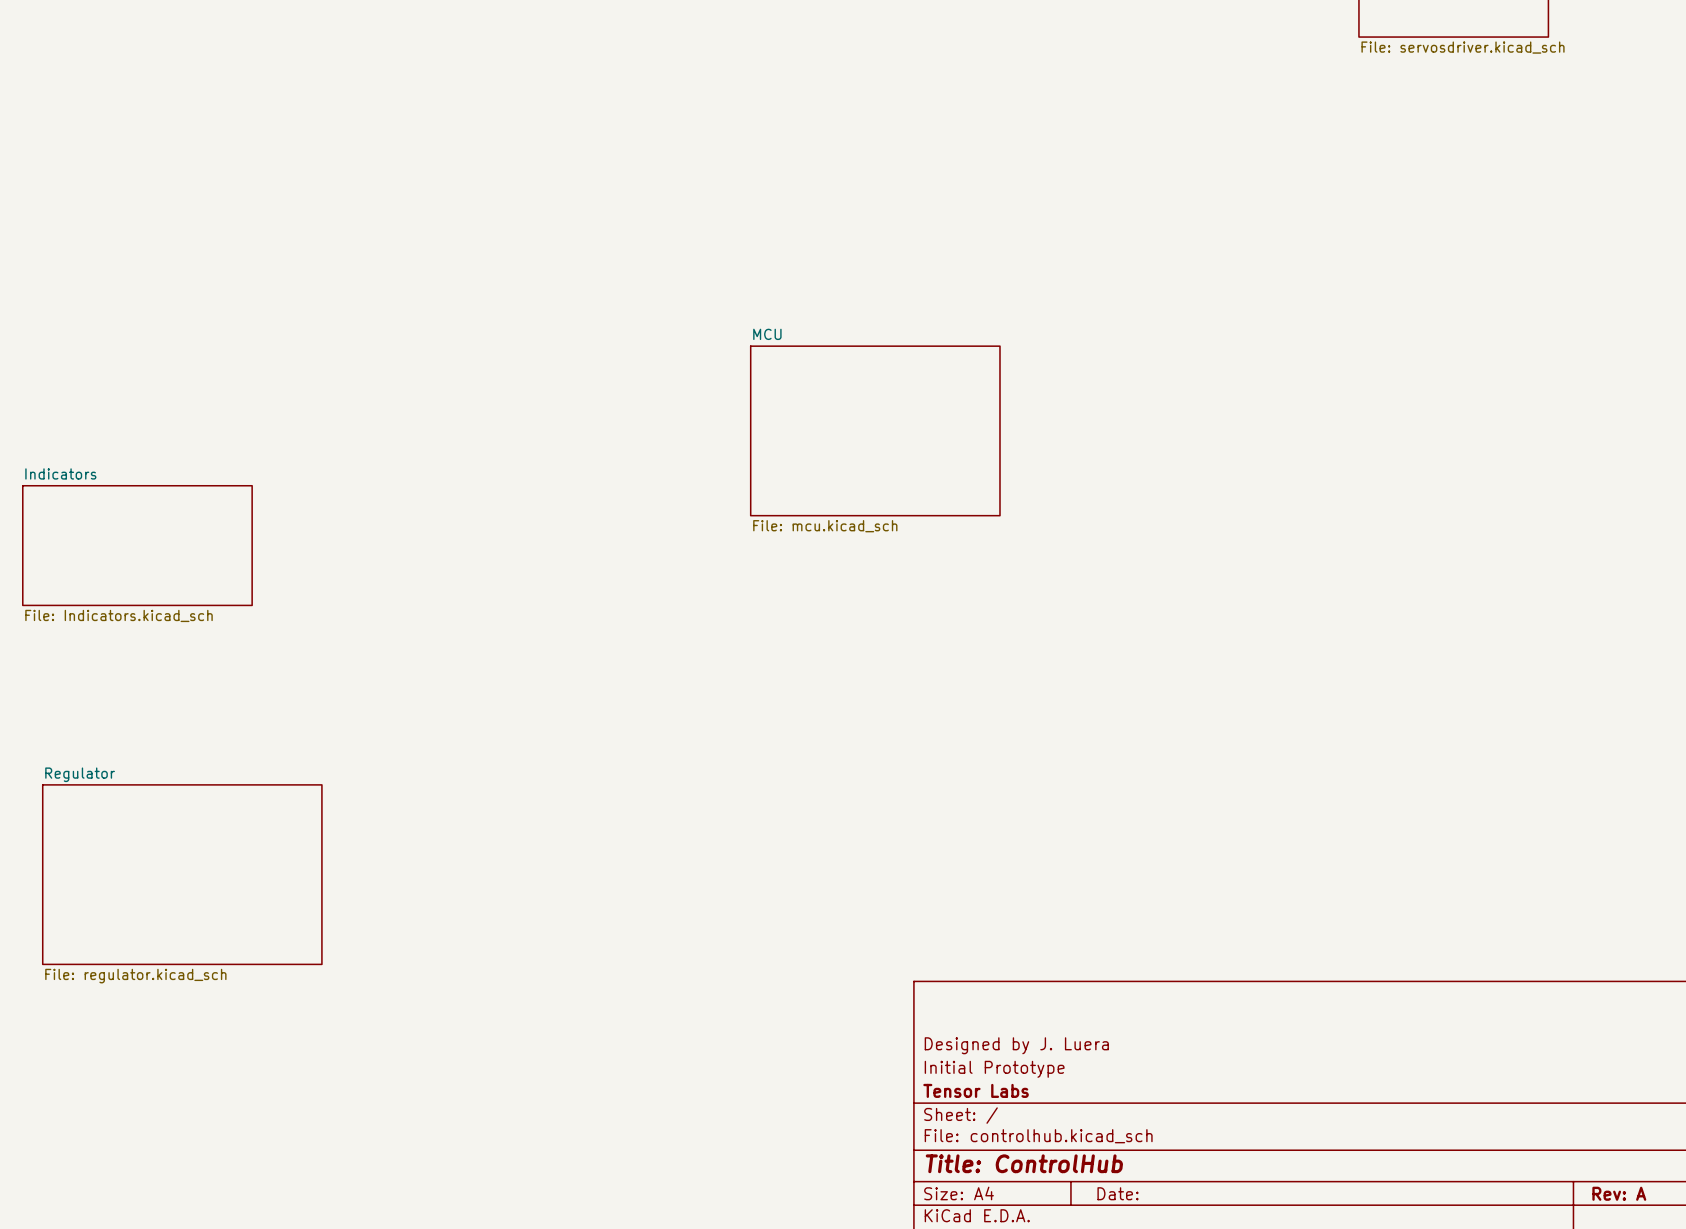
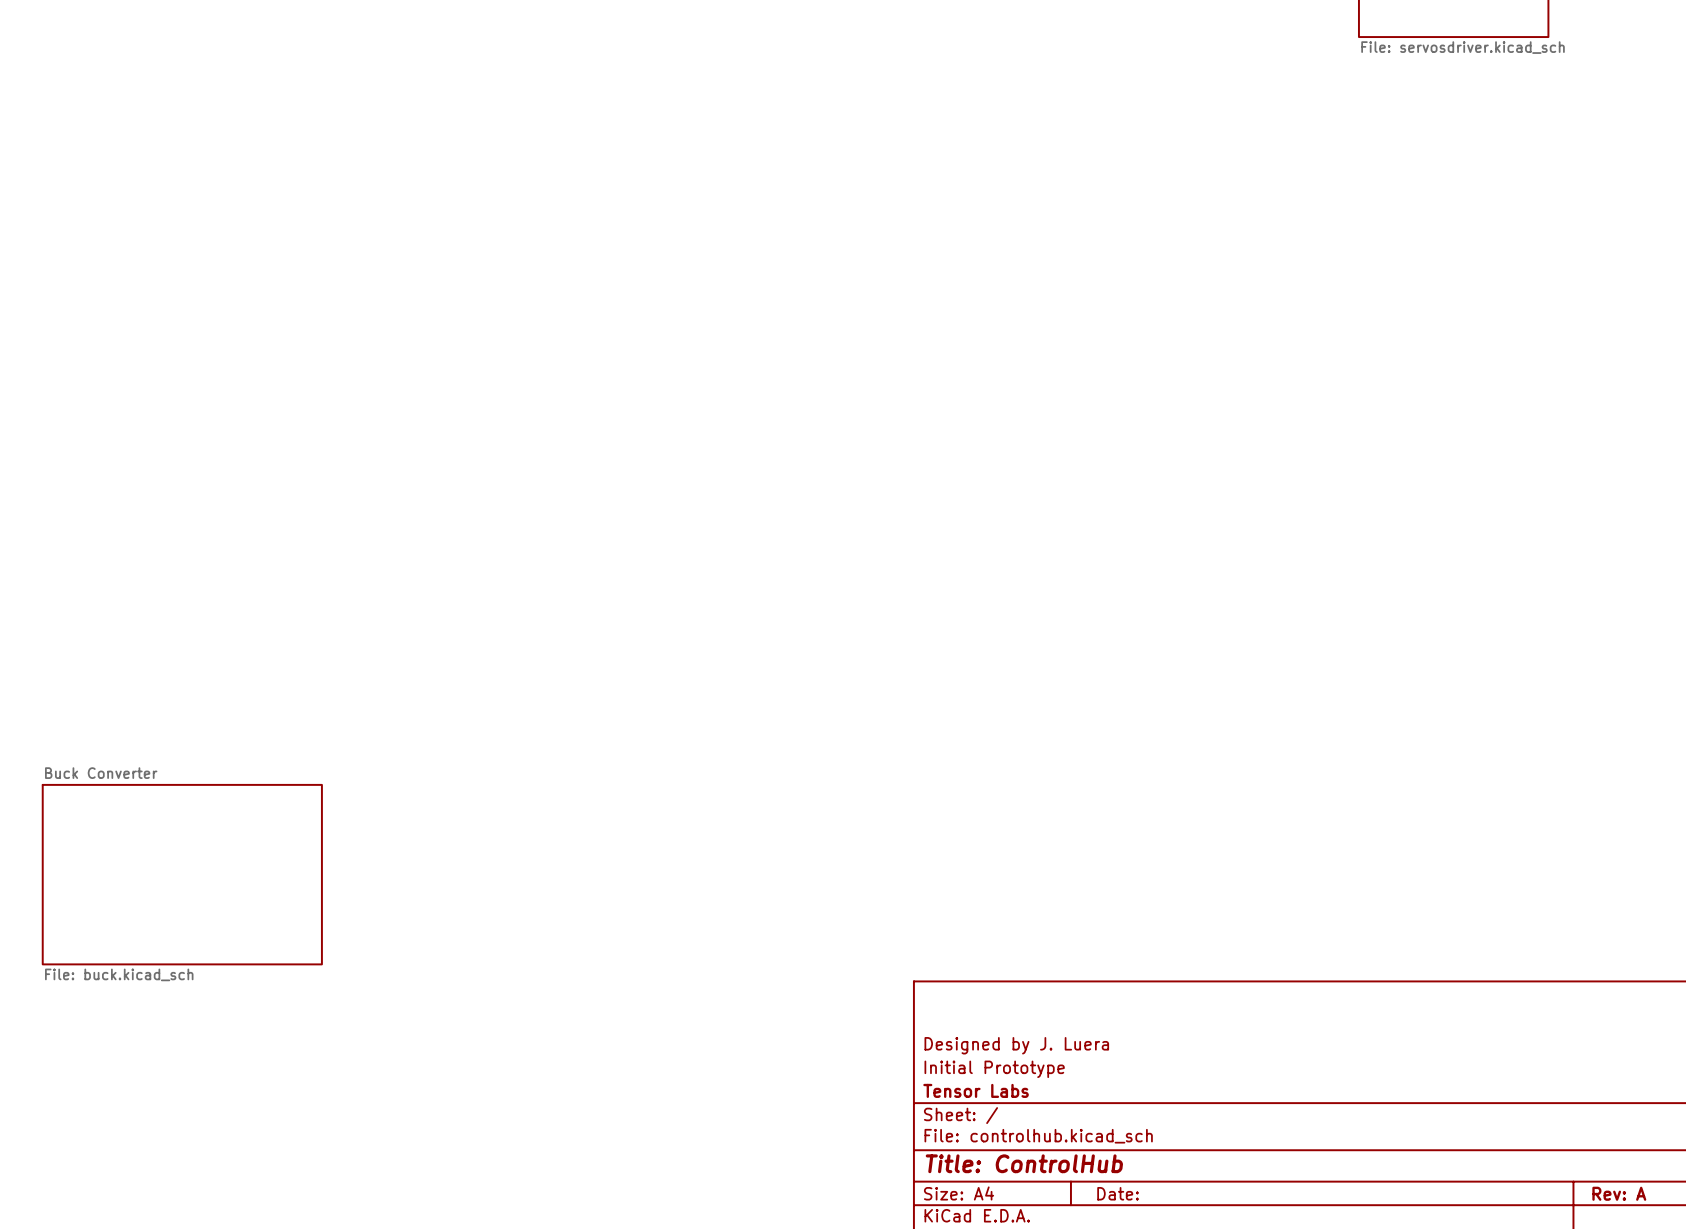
sheet MCU: File: mcu.kicad_sch (875, 430) -> none
sheet Indicators: File: Indicators.kicad_sch (137, 545) -> none
sheet Regulator name: Regulator (80, 774) -> Buck Converter (101, 773)
sheet Regulator value: File: regulator.kicad_sch (135, 976) -> File: buck.kicad_sch (119, 974)

